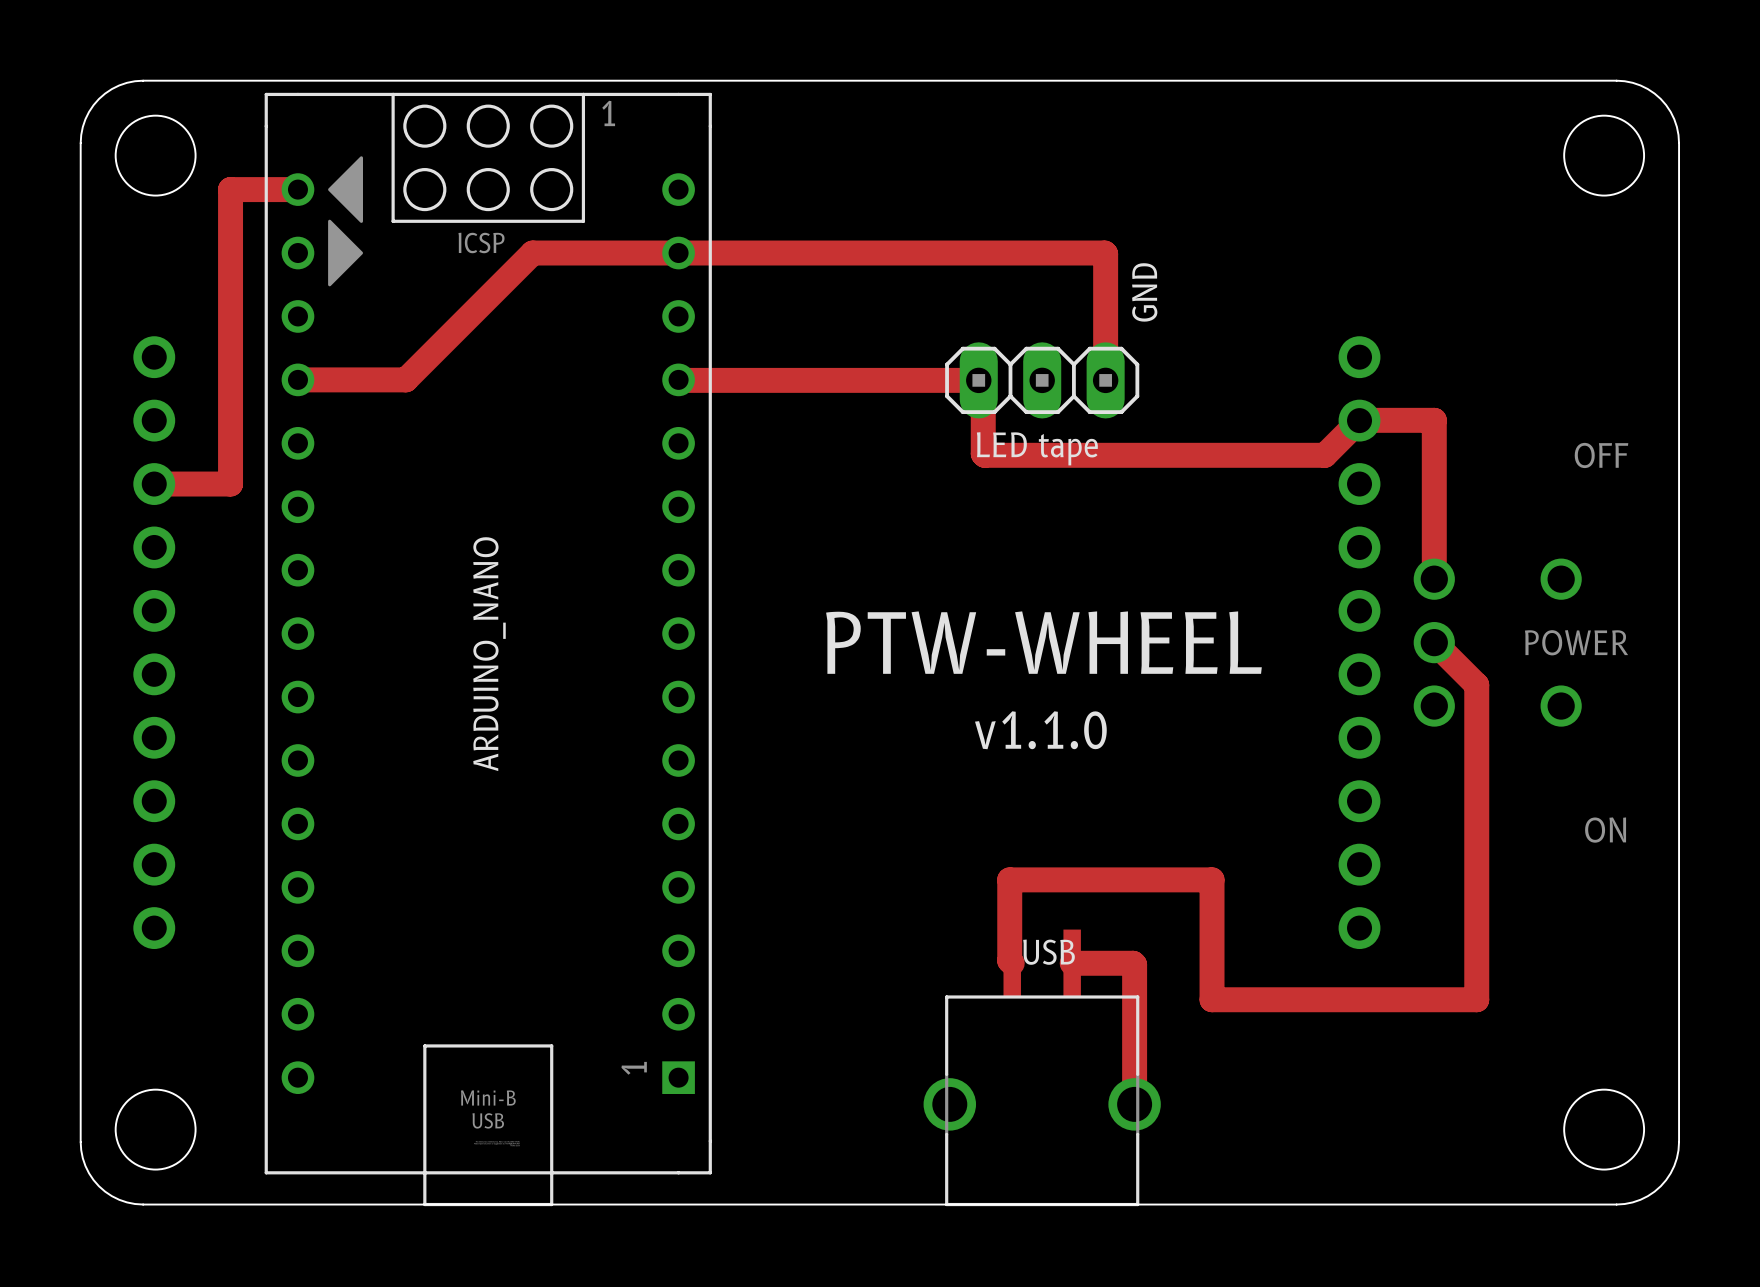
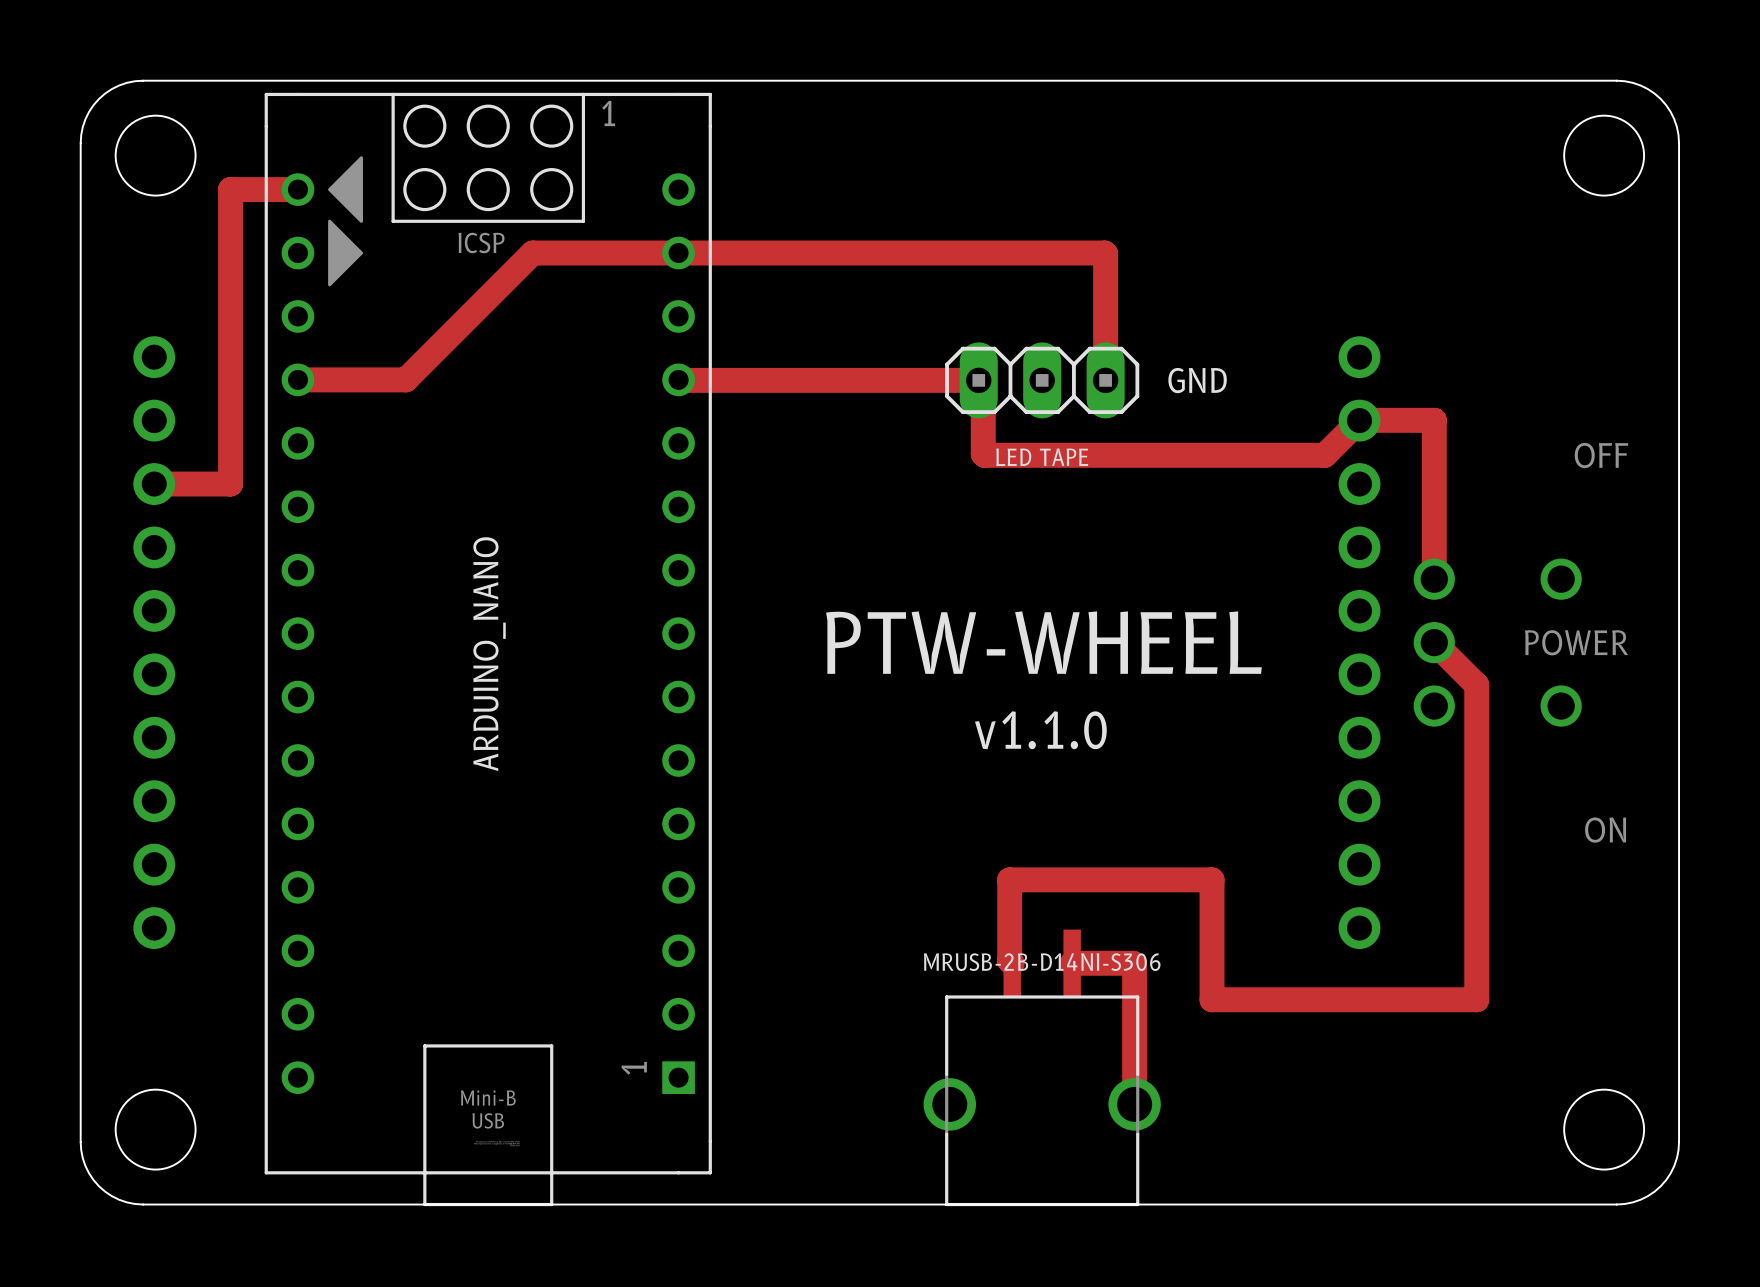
text rotation: 0° (1144, 292) -> 90° clockwise (1197, 380)
text position: GND (1144, 292) -> GND (1197, 380)
part value: LED tape (1037, 448) -> LED TAPE (1042, 457)
USB name: USB (1049, 952) -> MRUSB-2B-D14NI-S306 (1042, 962)

